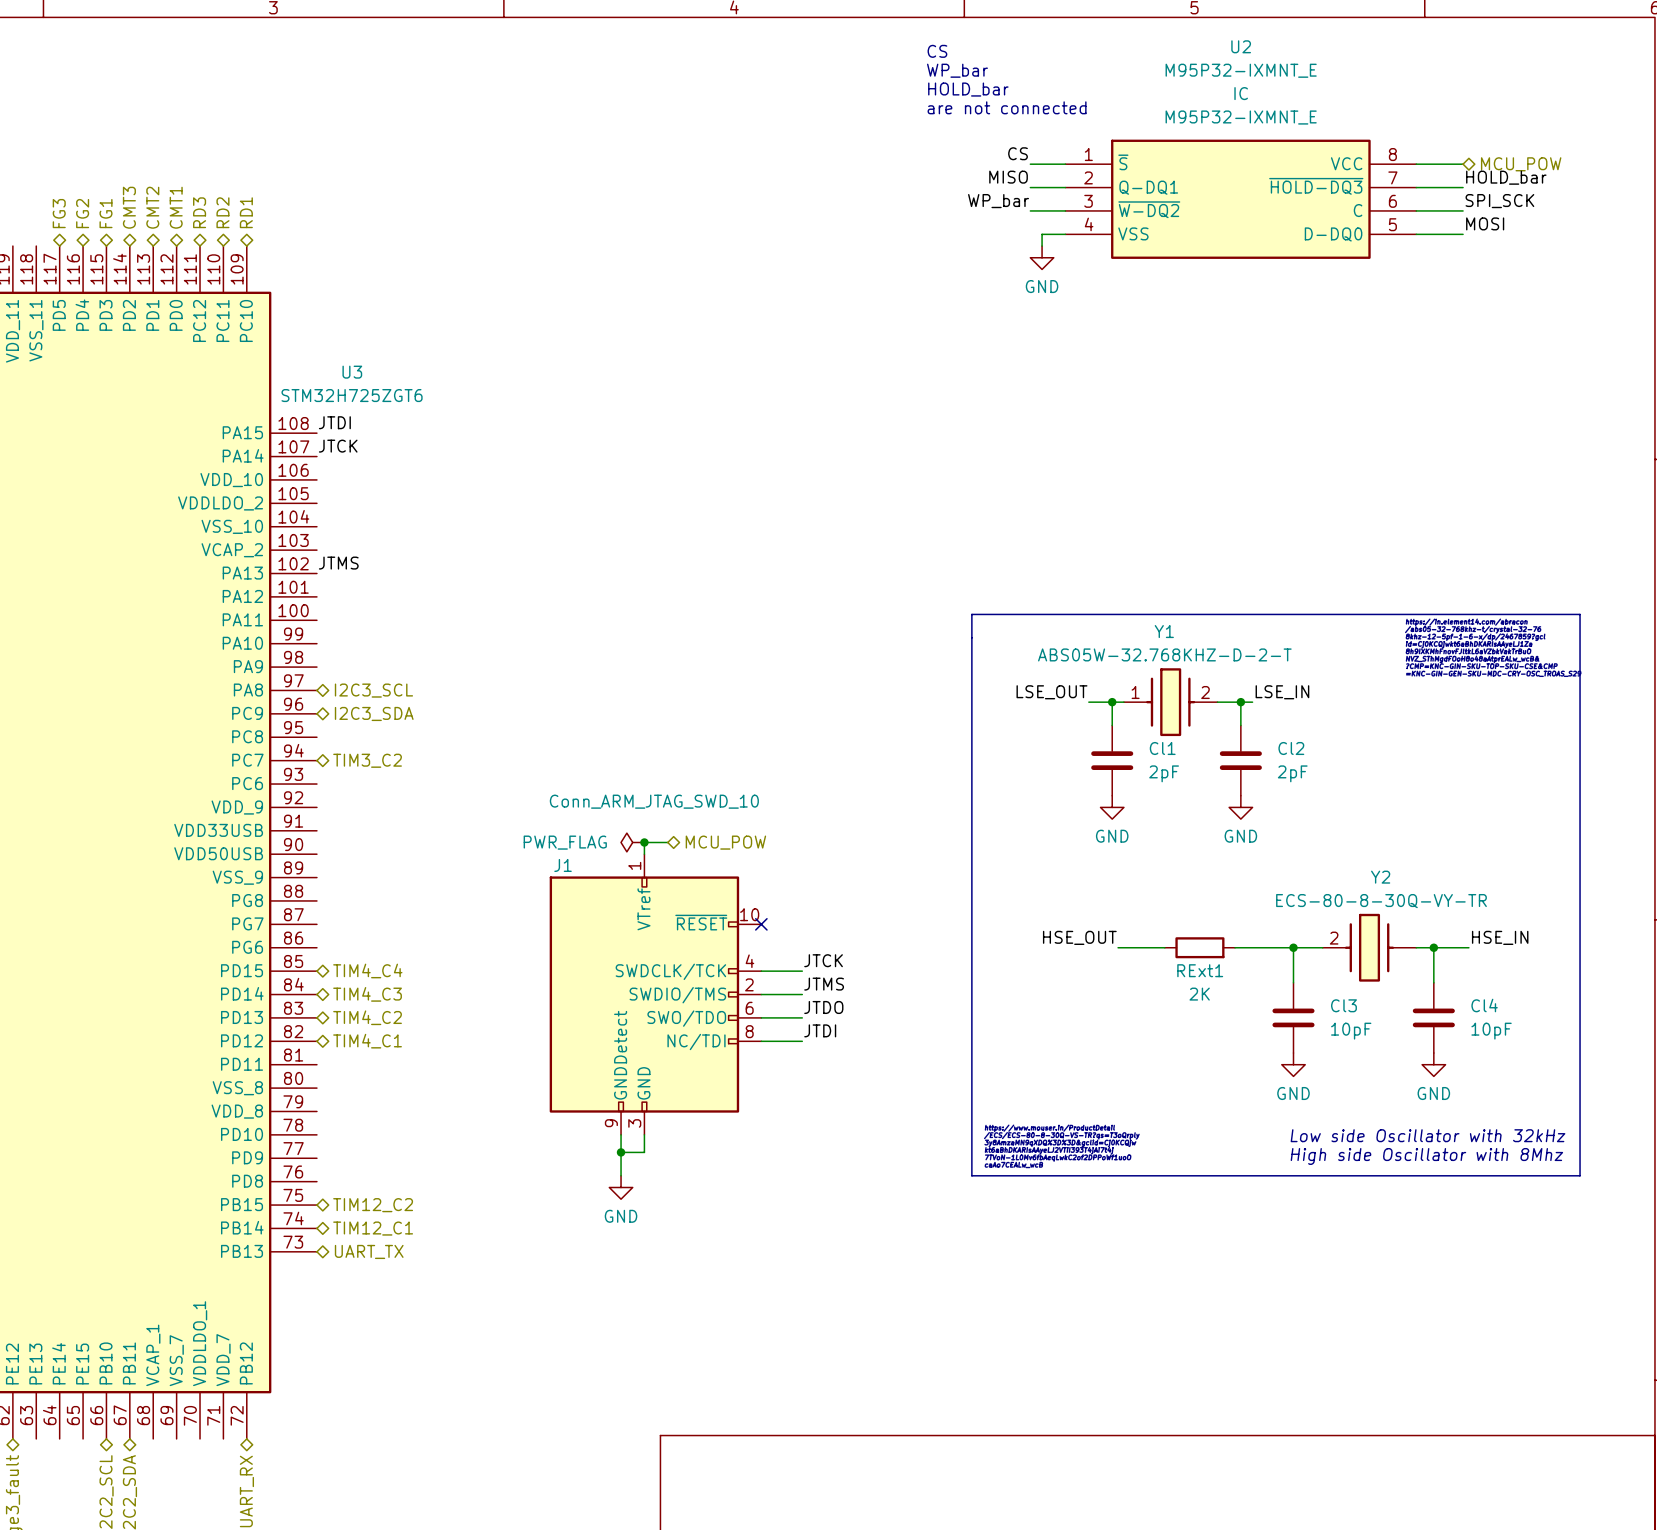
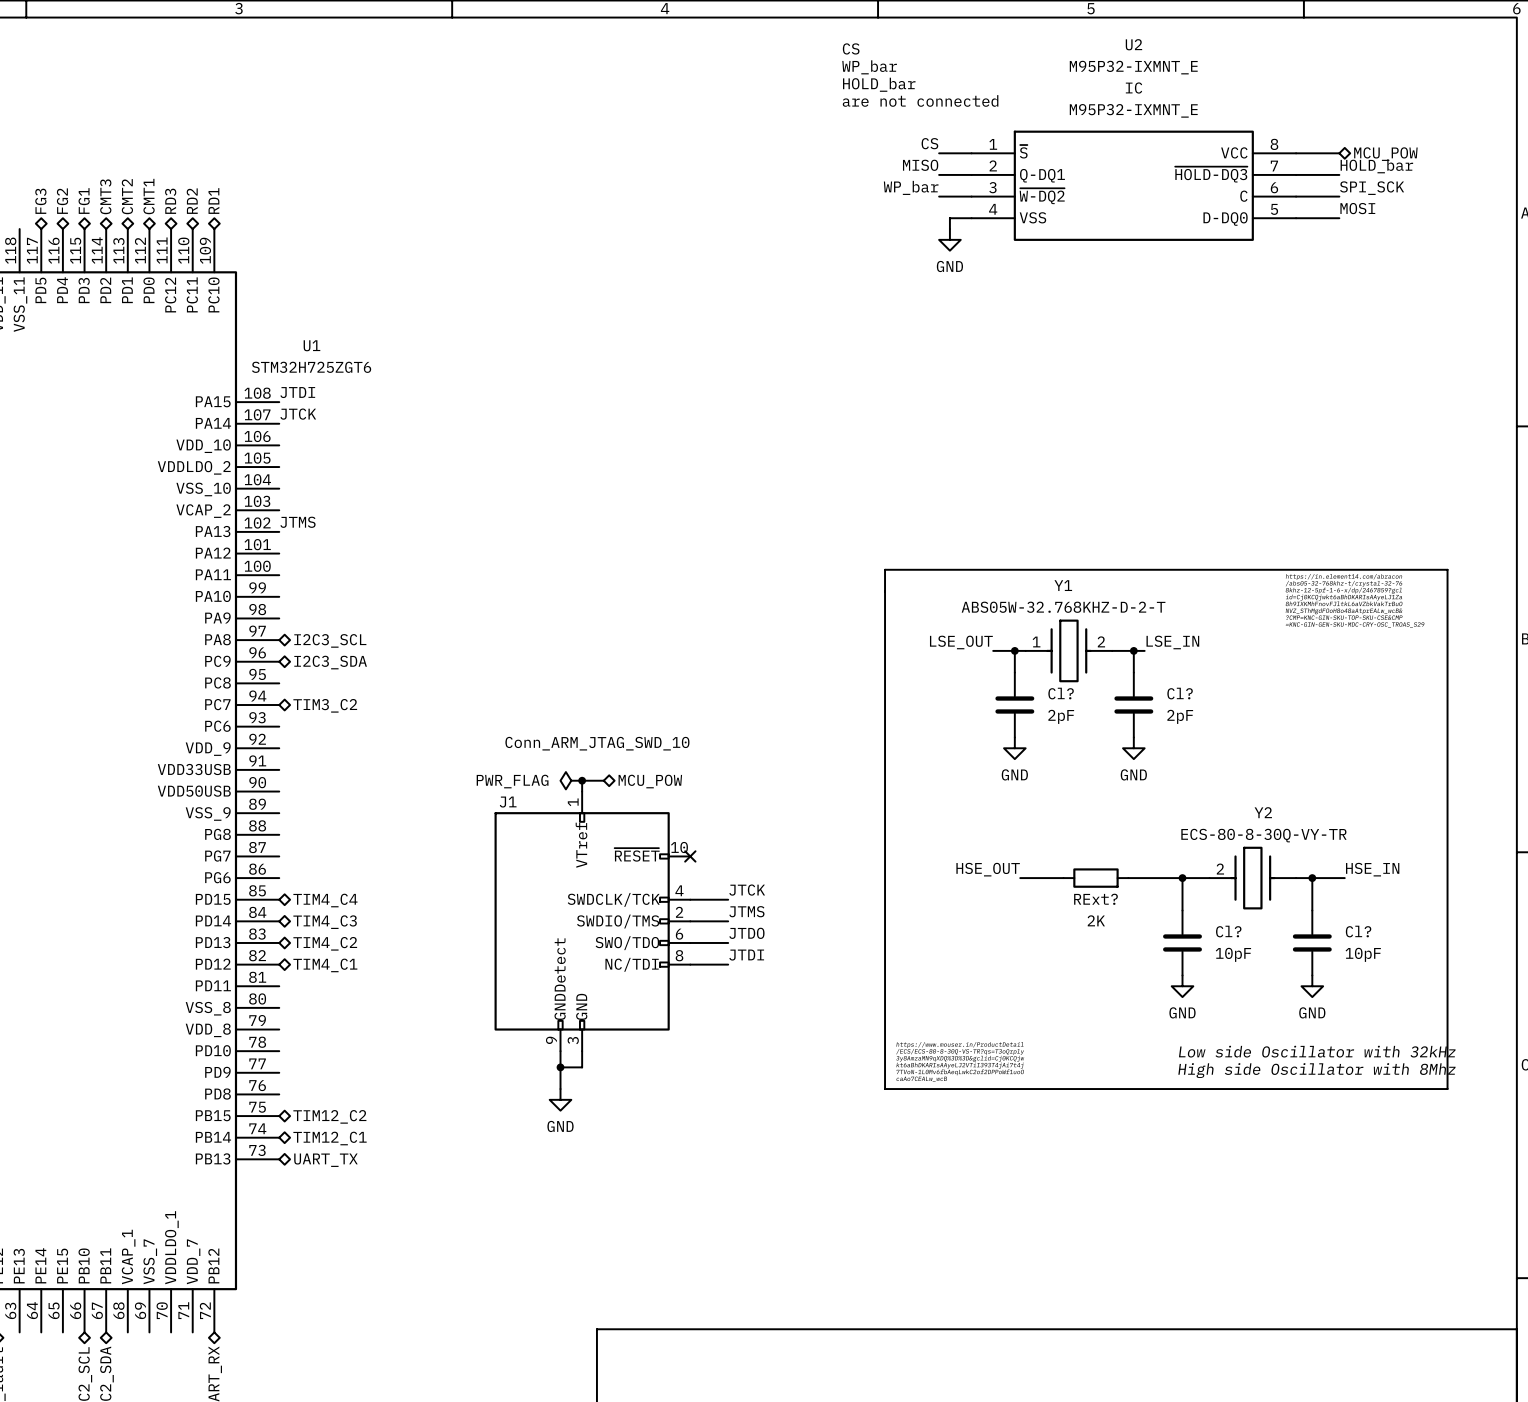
U3 name: U3 (352, 372) -> U1 (311, 345)
Cl1 name: Cl1 (1162, 748) -> Cl? (1061, 693)
Cl2 name: Cl2 (1291, 748) -> Cl? (1180, 693)
RExt1 name: RExt1 (1200, 970) -> RExt? (1095, 899)
Cl3 name: Cl3 (1343, 1005) -> Cl? (1228, 931)
Cl4 name: Cl4 (1484, 1005) -> Cl? (1358, 931)

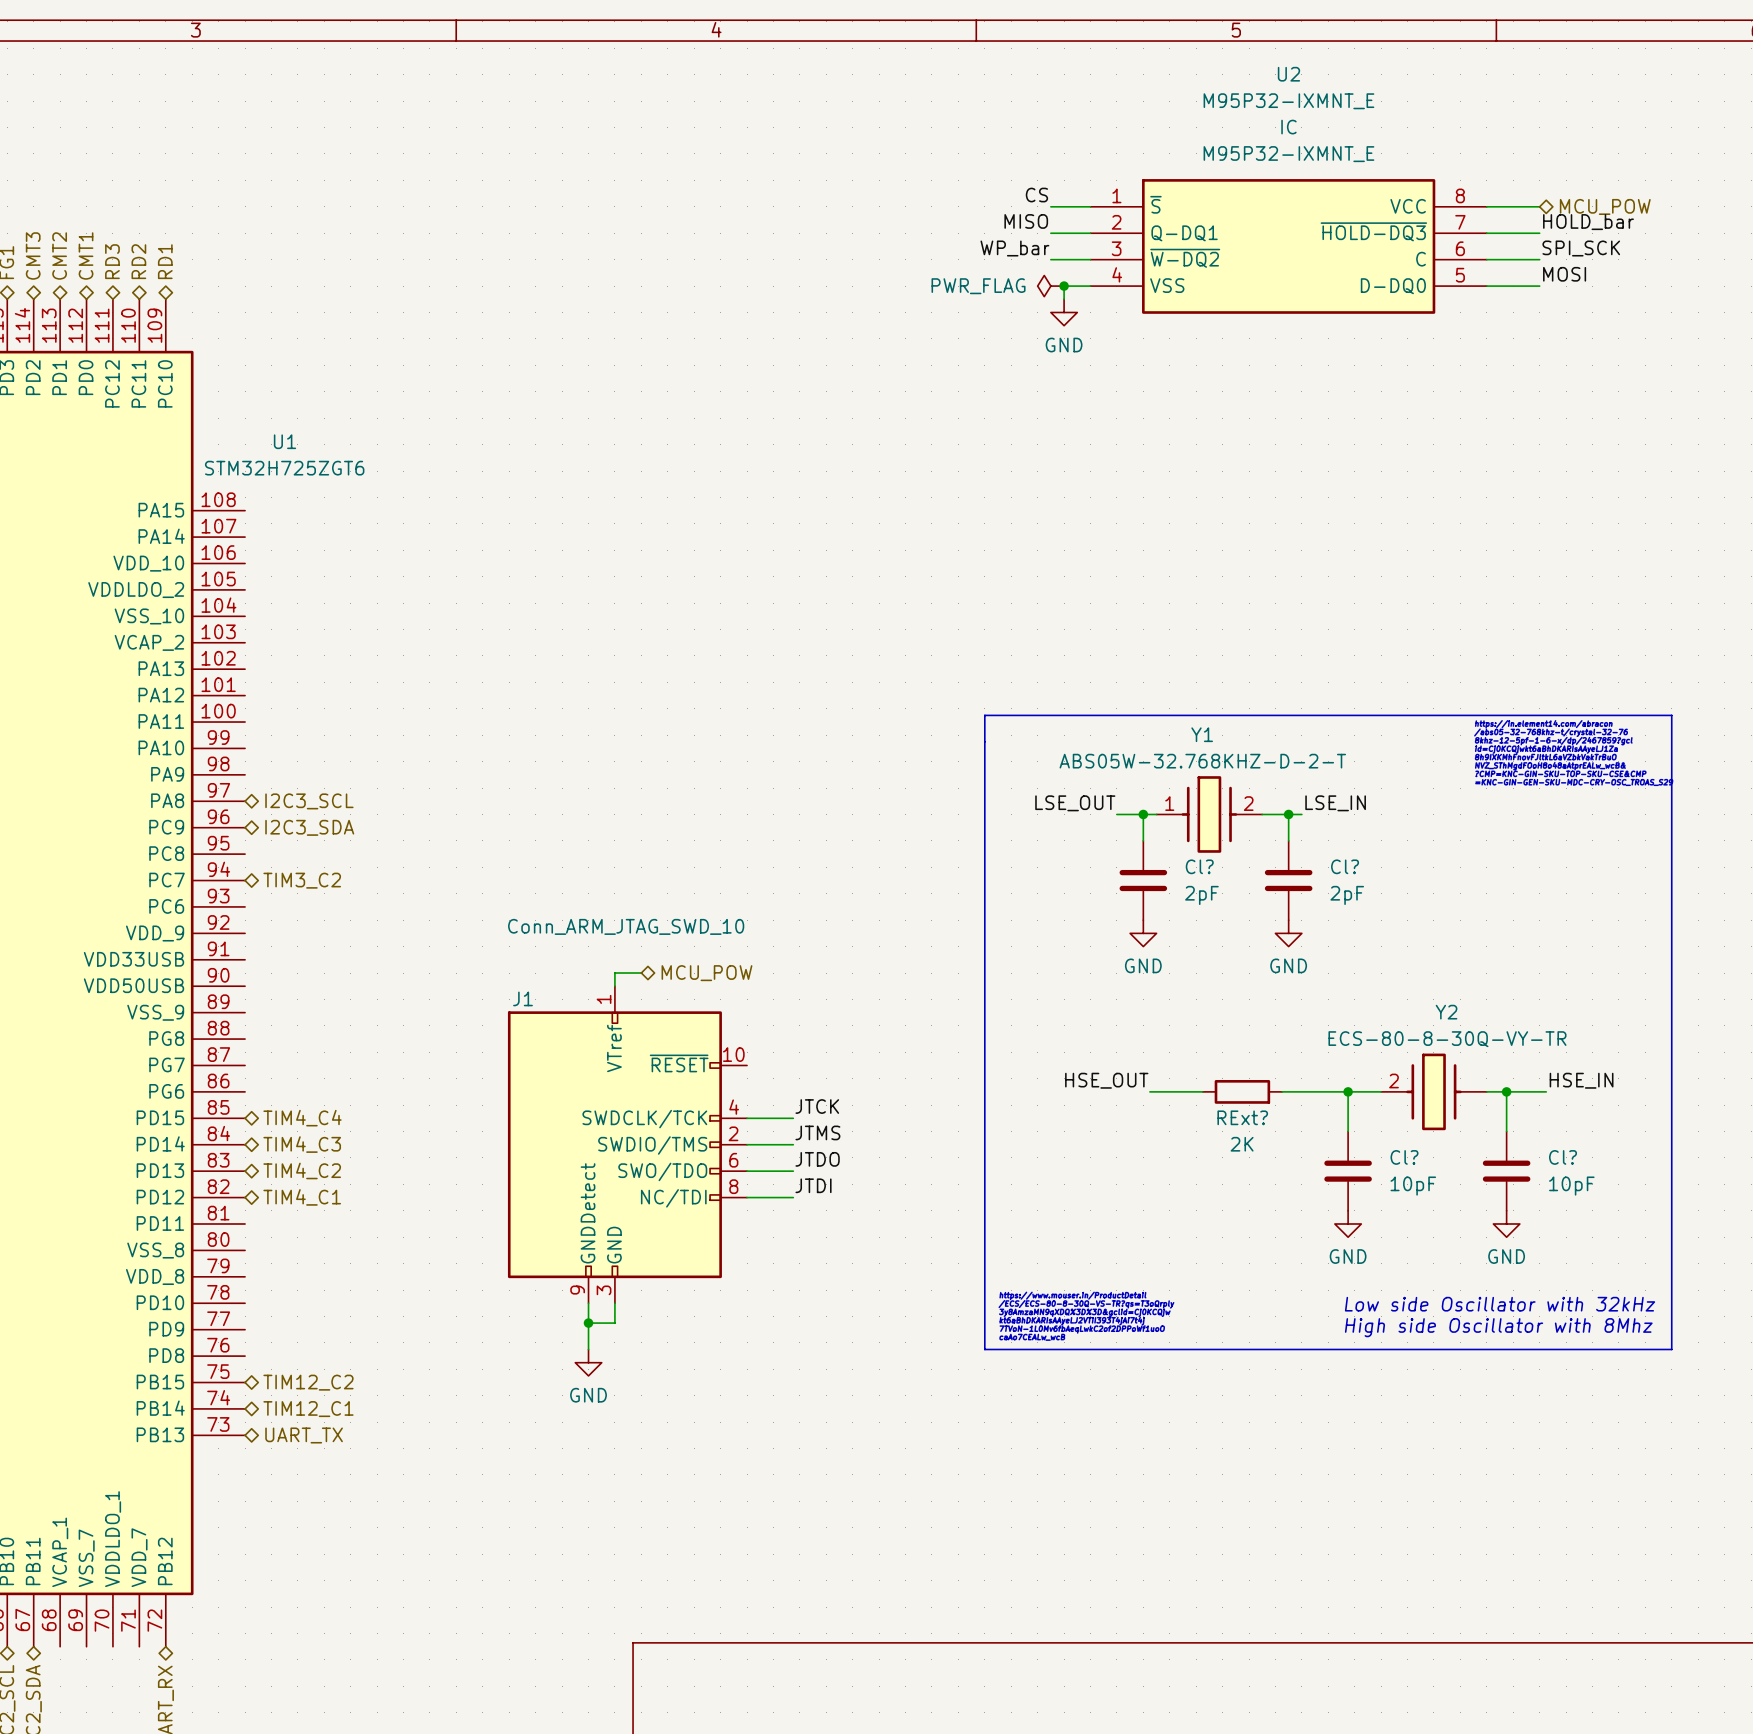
text: CS (851, 48) -> none
text: WP_bar (869, 67) -> none
text: HOLD_bar (879, 84) -> none
text: are not connected (920, 100) -> none
power symbol: none -> PWR_FLAG (1050, 286)
junction: none -> (1064, 286)
label: JTDI (297, 392) -> none
label: JTCK (298, 414) -> none
label: JTMS (297, 522) -> none
power symbol: PWR_FLAG (571, 780) -> none
junction: (582, 780) -> none
no-connect mark: (690, 856) -> none

